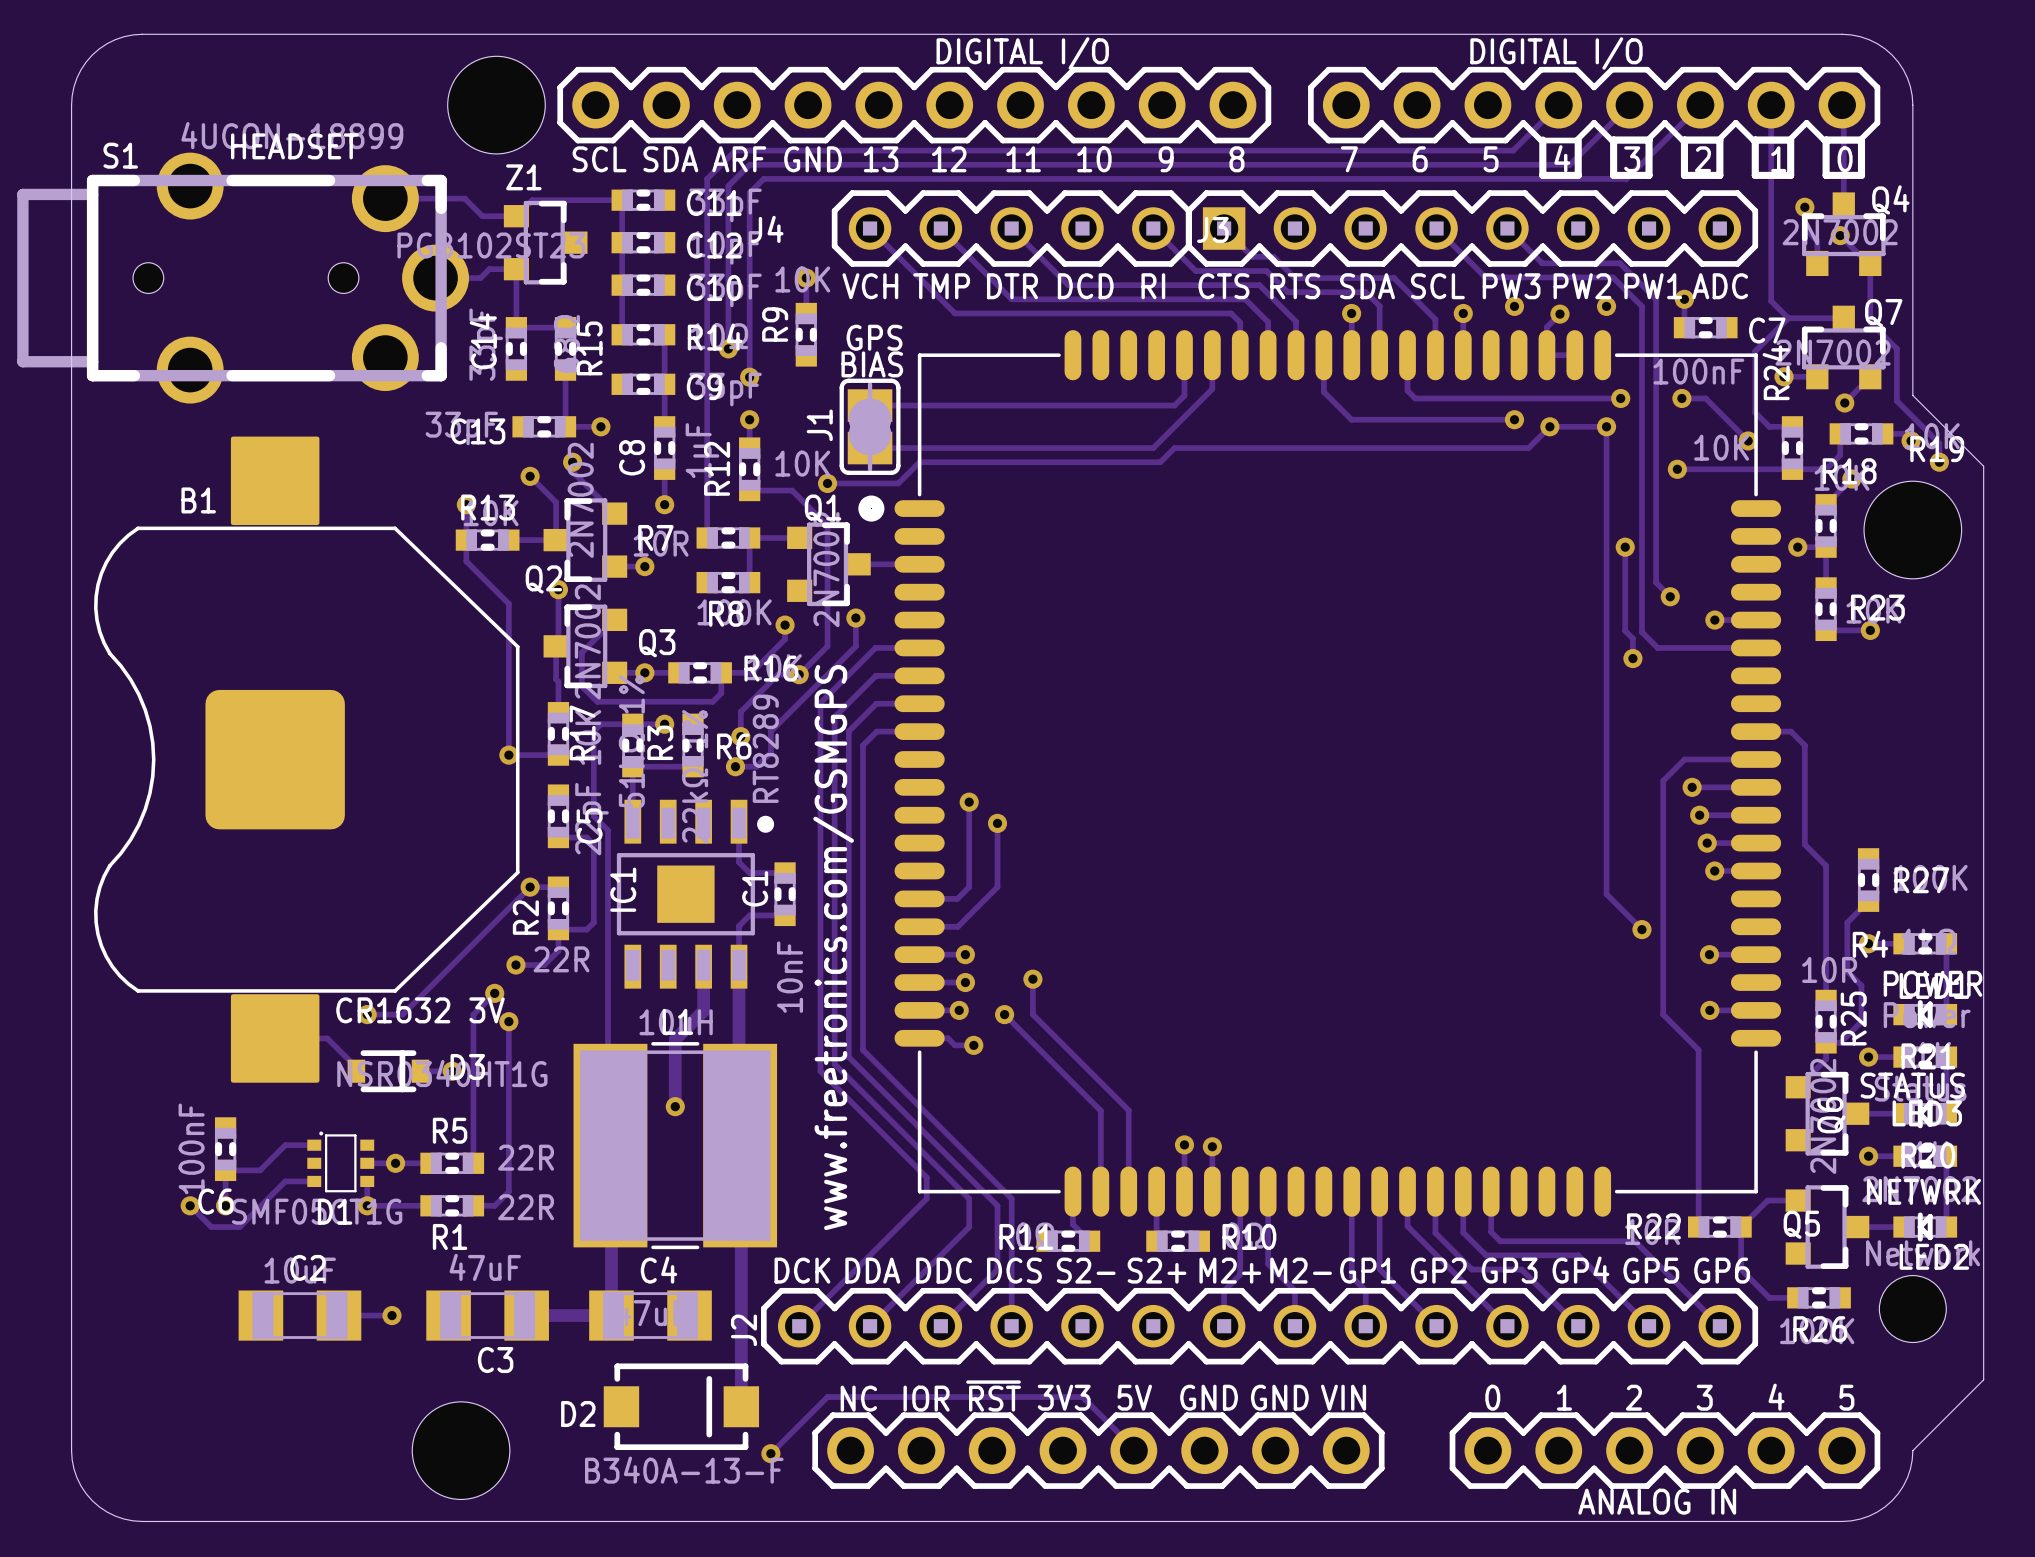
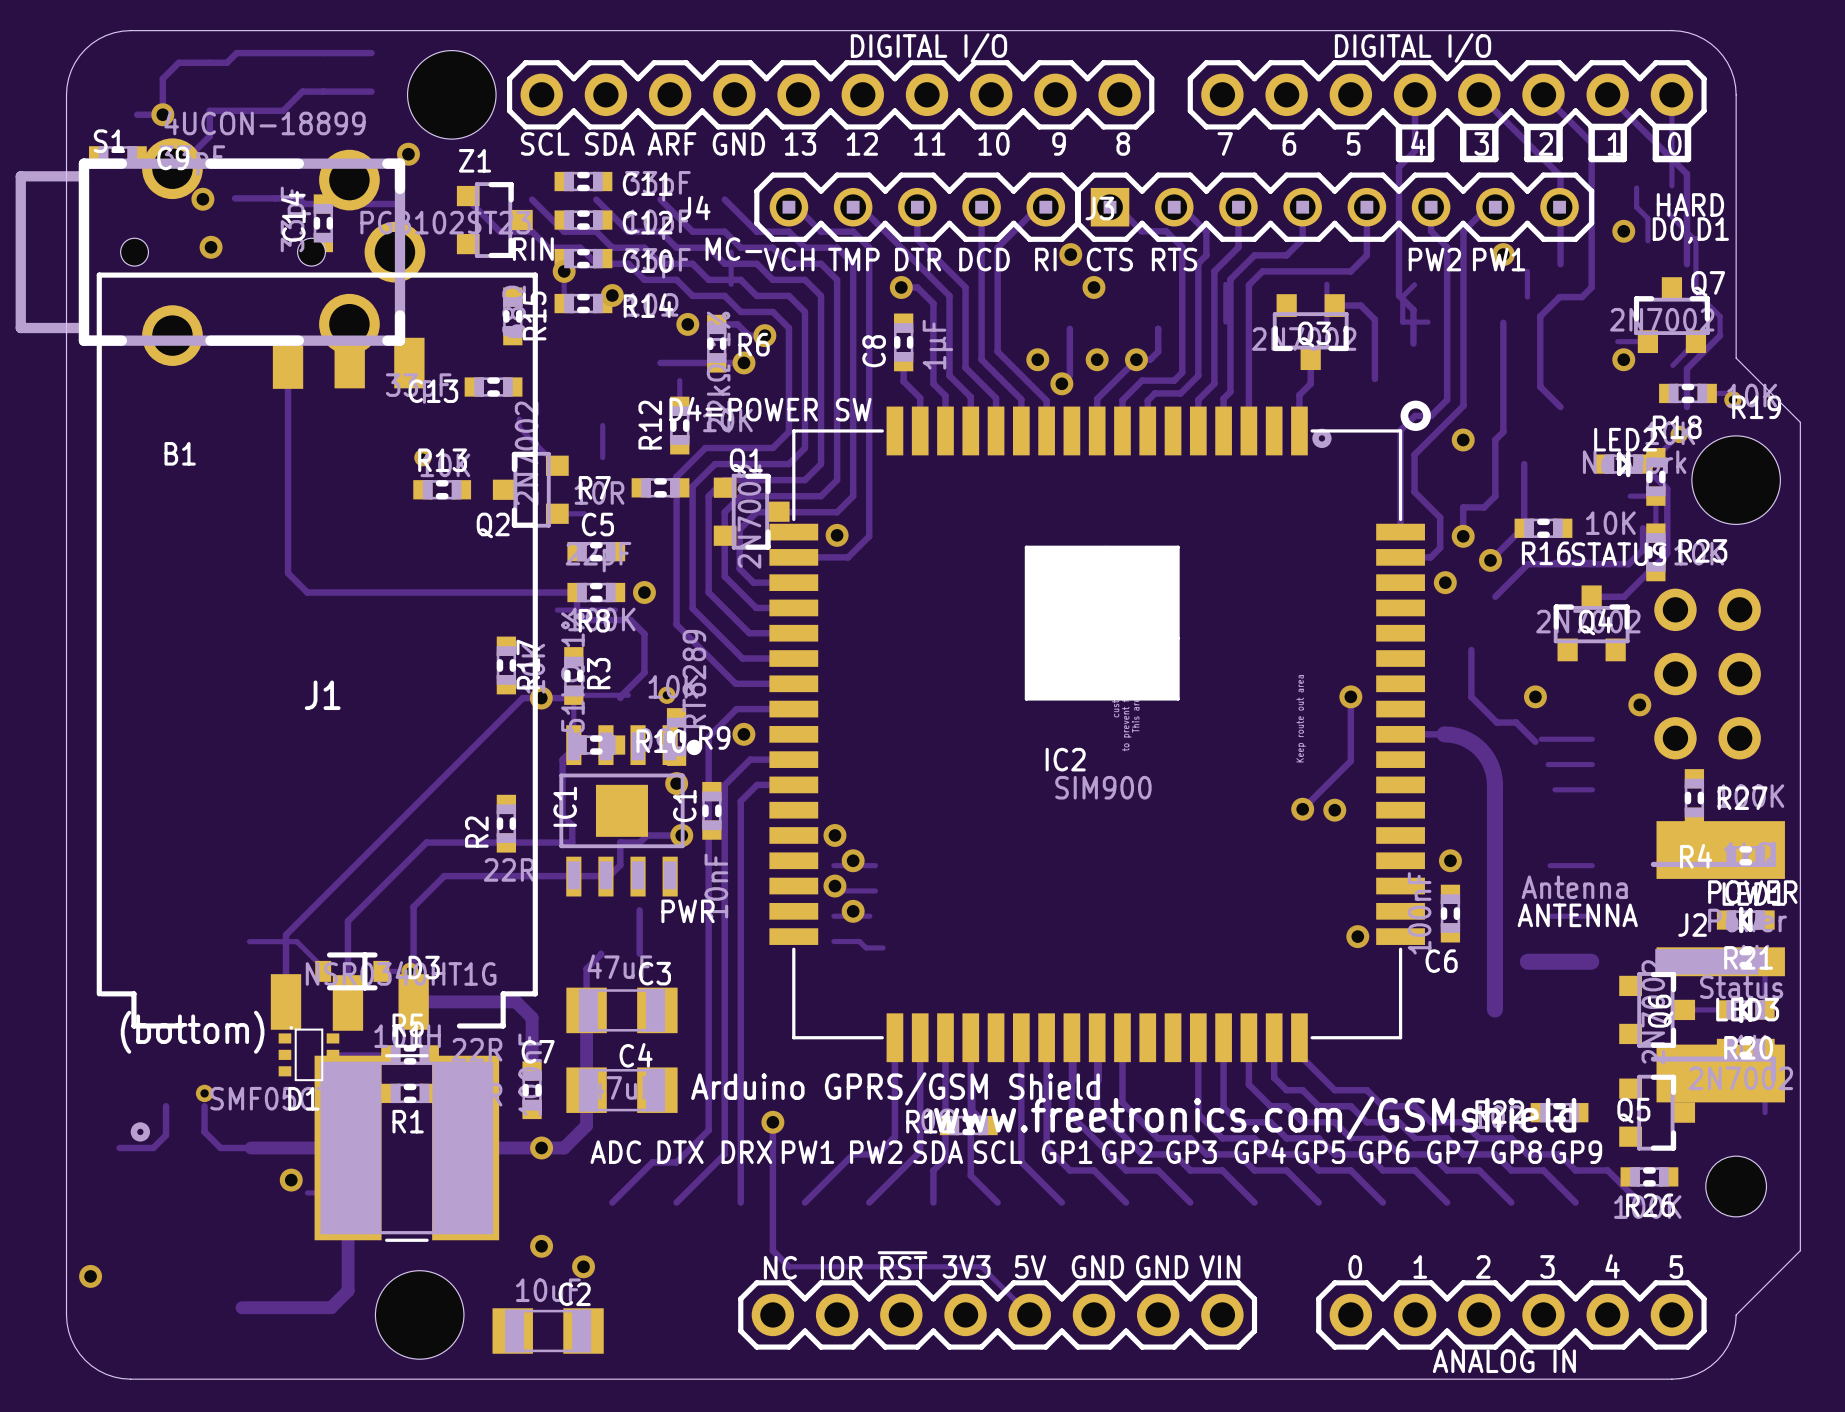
part footprint: [71, 34, 1984, 1522] -> [66, 30, 1801, 1380]
track: none -> (371, 53) (236, 53) (226, 62) (178, 62) (162, 78) (162, 114) (137, 114)
track: none -> (371, 91) (302, 91) (283, 110) (209, 110) (209, 136) (190, 155) (137, 155)
track: none -> (1415, 94) (1415, 151) (1399, 167) (1399, 295) (1413, 309) (1413, 343)
track: none -> (1479, 94) (1560, 176) (1560, 264)
track: none -> (1543, 94) (1591, 142) (1591, 287) (1582, 297) (1559, 297) (1540, 316) (1540, 386) (1560, 407)
track: none -> (1607, 94) (1686, 174) (1686, 264)
track: (1558, 105) (1513, 150) (735, 150) (707, 178) (707, 537) -> none
track: (1629, 105) (1569, 164) (749, 164) (728, 186) (728, 348) -> none
track: (1700, 105) (1626, 178) (763, 178) (749, 193) (749, 377) -> none
track: (1771, 105) (1771, 301) (1788, 318) -> none
via: none -> (162, 114)
text: HEADSET (294, 146) -> none
via: none -> (408, 154)
track: (385, 198) (464, 198) (482, 216) (516, 216) (532, 200) (622, 200) (622, 299) -> none
Q4 name position: Q4 (1890, 199) -> Q4 (1595, 622)
via: (1804, 207) -> none
track: none -> (235, 198) (298, 198) (304, 204) (400, 204)
via: none -> (202, 199)
track: none -> (467, 199) (499, 231) (532, 231) (548, 247) (580, 247) (596, 263) (628, 263) (644, 279) (676, 279) (692, 295) (724, 295) (740, 311) (772, 311) (788, 328) (788, 431) (772, 448) (705, 448) (676, 476) (676, 624) (735, 683) (793, 683)
track: none -> (532, 199) (564, 231) (596, 231) (612, 247) (644, 247) (660, 263) (692, 263) (708, 279) (740, 279) (756, 295) (788, 295) (805, 311) (805, 448) (788, 464) (715, 464) (692, 486) (692, 608) (742, 658) (793, 658)
track: none -> (596, 199) (628, 231) (660, 231) (676, 247) (708, 247) (724, 263) (756, 263) (772, 279) (805, 279) (821, 295) (821, 464) (805, 480) (724, 480) (708, 496) (708, 592) (749, 633) (793, 633)
track: none -> (660, 199) (692, 231) (724, 231) (740, 247) (772, 247) (788, 263) (821, 263) (837, 279) (837, 480) (821, 496) (740, 496) (724, 512) (724, 576) (756, 607) (793, 607)
track: none -> (724, 199) (756, 231) (788, 231) (805, 247) (837, 247) (853, 263) (853, 496) (837, 512) (756, 512) (739, 529) (739, 568) (753, 582) (793, 582)
track: none -> (788, 199) (821, 231) (853, 231) (869, 247) (869, 536) (848, 557) (793, 557)
track: none -> (853, 199) (949, 295) (949, 375) (970, 397) (970, 430)
track: none -> (917, 199) (917, 239) (965, 287) (965, 367) (996, 398) (996, 430)
track: none -> (981, 199) (981, 359) (1021, 399) (1021, 430)
track: none -> (1045, 199) (997, 247) (997, 351) (1046, 400) (1046, 430)
track: none -> (1110, 199) (1141, 231) (1166, 231) (1182, 247) (1182, 372) (1174, 380) (1142, 380) (1122, 400) (1122, 430)
track: none -> (1174, 199) (1206, 231) (1206, 255) (1198, 263) (1198, 375) (1180, 393) (1154, 393) (1147, 400) (1147, 430)
track: none -> (1238, 199) (1238, 247) (1214, 271) (1214, 383) (1198, 399) (1198, 430)
track: none -> (1302, 199) (1302, 239) (1286, 255) (1254, 255) (1230, 279) (1230, 391) (1223, 398) (1223, 430)
track: none -> (1366, 199) (1366, 255) (1350, 271) (1262, 271) (1248, 285) (1248, 430)
track: none -> (1431, 199) (1431, 231) (1447, 247) (1447, 399) (1431, 415) (1415, 415) (1400, 430) (1400, 532)
track: none -> (1495, 199) (1463, 231) (1463, 405) (1414, 454) (1414, 492) (1440, 517) (1440, 547) (1430, 557) (1400, 557)
text: none -> HARD (1690, 204)
track: (870, 228) (955, 313) (1231, 313) (1240, 322) (1240, 355) -> none
track: (940, 228) (1011, 299) (1245, 299) (1268, 322) (1268, 355) -> none
track: (1011, 228) (1068, 285) (1259, 285) (1296, 321) (1296, 355) -> none
track: (1153, 228) (1195, 271) (1266, 271) (1287, 292) (1365, 292) (1379, 306) (1379, 355) -> none
track: (1224, 228) (1252, 256) (1273, 256) (1294, 278) (1394, 278) (1435, 319) (1435, 355) -> none
track: (1436, 228) (1485, 277) (1613, 277) (1641, 306) (1641, 632) (1657, 647) (1756, 647) -> none
track: (1507, 228) (1542, 263) (1620, 263) (1656, 299) (1656, 582) (1670, 596) -> none
Q4 position: (1843, 234) -> (1591, 623)
via: (1840, 235) -> none
text: none -> D0,D1 (1690, 230)
via: none -> (1623, 231)
via: none -> (211, 247)
text: none -> RIN (533, 249)
text: none -> MC- (733, 249)
track: (435, 278) (480, 278) (489, 269) (516, 269) (516, 327) (565, 327) -> none
via: (806, 278) -> none
via: none -> (1070, 254)
via: none -> (1503, 254)
text: SDA (1367, 286) -> none
text: SCL (1437, 286) -> none
text: PW3 (1511, 286) -> none
text: ADC (1720, 286) -> none
via: none -> (564, 271)
via: (1684, 299) -> none
via: (1514, 306) -> none
via: (1606, 306) -> none
via: (1351, 313) -> none
via: (1463, 313) -> none
via: (1559, 314) -> none
track: none -> (901, 287) (917, 287) (933, 303) (933, 383) (945, 395) (945, 430)
via: none -> (901, 287)
via: none -> (1093, 287)
track: (1788, 318) (1843, 318) -> none
track: (1788, 318) (1755, 351) (1755, 412) (1769, 426) (1792, 426) -> none
R9 name rotation: 0° (775, 324) -> 90° clockwise (714, 737)
R9 name position: R9 (775, 324) -> R9 (714, 737)
via: none -> (612, 295)
C7 rotation: 0° (1705, 327) -> 90° clockwise (532, 1090)
C7 position: (1705, 327) -> (532, 1090)
C7 name position: C7 (1767, 330) -> C7 (538, 1051)
track: (664, 334) (664, 426) -> none
R9 position: (806, 334) -> (676, 737)
track: none -> (1334, 305) (1360, 305) (1374, 319) (1374, 378)
text: GPS (874, 337) -> none
C14 position: (516, 348) -> (323, 223)
via: (728, 348) -> none
track: (1184, 355) (1184, 395) (1174, 405) (870, 405) -> none
track: (1212, 355) (1212, 388) (1153, 448) (870, 448) -> none
track: (1323, 355) (1323, 392) (1351, 419) (1514, 419) -> none
track: (1407, 355) (1407, 390) (1415, 398) (1620, 398) -> none
track: none -> (1503, 322) (1503, 431) (1495, 440) (1495, 496) (1484, 507) (1463, 507) (1463, 536)
track: none -> (716, 324) (737, 324) (748, 335) (764, 335)
track: none -> (1069, 328) (1069, 375)
track: none -> (1158, 328) (1158, 351) (1150, 359) (1136, 359) (1097, 398) (1097, 430)
text: BIAS (872, 364) -> none
track: (565, 370) (565, 426) (600, 426) -> none
via: none -> (764, 335)
track: (1896, 370) (1896, 401) (1939, 443) (1939, 462) -> (1720, 335) (1686, 368) (1686, 407)
via position: (1784, 376) -> (1623, 359)
via position: (749, 377) -> (687, 324)
C9 position: (643, 384) -> (117, 155)
track: none -> (1310, 358) (1310, 383) (1299, 395) (1299, 430)
via: none -> (1037, 359)
via: none -> (1097, 359)
via: none -> (1136, 359)
track: none -> (903, 361) (903, 381) (920, 398) (920, 430)
via: (1620, 398) -> none
track: (1681, 398) (1705, 398) (1748, 440) -> none
via: (1681, 398) -> none
track: none -> (288, 363) (288, 573) (307, 592) (577, 592) (577, 611) (585, 620) (630, 620) (644, 634) (644, 672) (620, 698)
track: none -> (660, 362) (743, 362)
via: none -> (743, 362)
via: (1844, 402) -> none
via: (749, 419) -> none
via: (1514, 419) -> none
via: none -> (1061, 383)
via: (600, 426) -> none
J1: (870, 426) -> none
via: (1549, 426) -> none
via: (1606, 426) -> none
track: (1840, 433) (1840, 455) (1826, 469) (1677, 469) -> none
via: (1748, 440) -> none
C8 position: (664, 448) -> (903, 342)
R24: 10K (1792, 448) -> none
text: none -> D4=POWER SW (770, 409)
via: (572, 462) -> none
via: (1939, 462) -> none
via: (1677, 469) -> none
drawing: none -> [1312, 428, 1332, 449]
track: (530, 476) (556, 502) (556, 540) (508, 540) -> none
via: (530, 476) -> none
track: (827, 483) (898, 483) (919, 462) (1160, 462) (1174, 448) (1528, 448) (1549, 426) (1606, 426) (1606, 894) (1641, 929) -> none
via: (827, 483) -> none
via: none -> (1463, 440)
track: (749, 490) (792, 490) (827, 525) (827, 646) (799, 674) (777, 674) (740, 711) (740, 736) -> none
track: (466, 504) (466, 561) (508, 603) (508, 755) (558, 755) -> none
via: (664, 504) -> none
track: none -> (1524, 464) (1524, 528) (1490, 560)
track: none -> (1643, 464) (1667, 488) (1667, 553) (1624, 596) (1591, 596)
track: (799, 537) (749, 537) (749, 582) -> none
track: (1625, 547) (1625, 630) (1632, 638) (1632, 658) -> none
via: (1625, 547) -> none
via: (1797, 547) -> none
via: (644, 566) -> none
R8 position: (728, 582) -> (596, 592)
track: none -> (1643, 528) (1643, 549) (1628, 564) (1527, 564) (1495, 596)
track: (558, 589) (558, 644) (556, 646) (558, 712) -> none
via: (558, 589) -> none
via: none -> (837, 535)
via: none -> (1463, 536)
via: (1670, 596) -> none
track: (855, 618) (855, 646) (770, 731) (770, 752) (756, 766) (735, 766) -> none
via: (855, 618) -> none
via: none -> (1490, 560)
track: (614, 619) (581, 652) (581, 686) (597, 701) (712, 701) (721, 693) (721, 672) (751, 672) (785, 639) (785, 625) -> none
via: (1714, 620) -> none
via: (785, 625) -> none
track: (1826, 630) (1870, 630) -> none
via: (1870, 630) -> none
via: none -> (1445, 582)
Q3 name position: Q3 (657, 643) -> Q3 (1314, 334)
Q3 rotation: 0° (585, 646) -> 90° counterclockwise (1310, 332)
Q3 position: (585, 646) -> (1310, 332)
track: (919, 647) (875, 647) (820, 702) (820, 1071) (926, 1177) (926, 1198) (799, 1326) -> none
via: none -> (644, 592)
via: (1632, 658) -> none
R16 name position: R16 (771, 668) -> R16 (1546, 553)
via: (644, 672) -> none
R16 position: (700, 672) -> (1543, 528)
via: (799, 674) -> none
track: (919, 675) (875, 675) (834, 717) (834, 1064) (969, 1198) (969, 1227) (870, 1326) -> none
track: (919, 703) (876, 703) (848, 731) (848, 1057) (997, 1205) (997, 1269) (940, 1326) -> none
track: none -> (1471, 649) (1471, 696) (1496, 722) (1516, 722) (1535, 741)
part: none -> (317, 651)
track: (664, 724) (600, 724) (593, 731) (593, 816) (608, 830) (608, 1078) (600, 1085) (600, 1136) (611, 1146) (611, 1315) (526, 1315) -> none
via: (664, 724) -> none
track: (919, 731) (876, 731) (862, 745) (862, 1050) (1011, 1198) (1011, 1326) -> none
track: (1756, 731) (1790, 731) (1804, 745) (1804, 844) (1826, 865) (1826, 1000) -> none
via: (740, 736) -> none
R6 position: (693, 745) -> (716, 343)
via: (508, 755) -> none
part: (306, 759) -> none
track: (1756, 759) (1684, 759) (1663, 780) (1663, 1014) (1698, 1050) (1698, 1227) -> none
text: none -> J1 (322, 695)
track: none -> (1350, 696) (1350, 761) (1302, 809)
via: none -> (1350, 696)
via: none -> (541, 698)
track: none -> (572, 698) (522, 698) (286, 934) (286, 1001)
part: (1319, 773) -> none
via: none -> (1639, 704)
track: none -> (793, 709) (736, 709) (708, 737) (708, 1130) (676, 1162) (652, 1162) (612, 1202)
track: (1692, 787) (1756, 787) -> none
via position: (1692, 787) -> (1535, 696)
track: (969, 802) (969, 887) (957, 898) (919, 898) -> none
via: (969, 802) -> none
IC2: none -> SIM900 (1100, 731)
via: none -> (743, 734)
track: none -> (1400, 734) (1444, 734) (1463, 738) (1480, 749) (1491, 765) (1494, 784) (1494, 1009)
via: (1699, 815) -> none
C5 rotation: 0° (558, 816) -> 90° clockwise (596, 551)
C5 position: (558, 816) -> (596, 551)
track: none -> (577, 745) (562, 759) (562, 815) (572, 825) (572, 842) (426, 842) (347, 921) (347, 1002)
track: (739, 821) (739, 862) (749, 872) (785, 872) -> none
track: (997, 823) (997, 887) (957, 926) (919, 926) -> none
via: (997, 823) -> none
track: (558, 837) (586, 837) (593, 844) (593, 922) (586, 929) (558, 929) (558, 950) (544, 965) (515, 965) -> none
track: none -> (793, 759) (750, 759) (724, 785) (724, 1154) (676, 1202)
via: (1707, 843) -> none
via: none -> (676, 783)
track: none -> (793, 784) (757, 784) (740, 801) (740, 1202)
via: (1714, 871) -> none
via: (530, 887) -> none
track: (558, 887) (530, 887) (402, 1014) (367, 1014) -> none
via: none -> (1302, 809)
via: none -> (1334, 810)
track: (1868, 901) (1847, 922) (1847, 971) (1861, 985) (1861, 1021) (1840, 1042) (1826, 1042) (1826, 1059) (1798, 1087) -> none
track: (785, 915) (749, 915) (739, 926) (739, 1124) (742, 1127) (742, 1143) (740, 1145) (741, 1406) -> none
track: none -> (681, 835) (646, 835) (639, 842) (620, 842) (620, 865) (609, 876) (444, 876) (413, 906) (413, 1001) (516, 1001) (532, 1017) (532, 1070)
via: none -> (681, 835)
via: none -> (834, 835)
via: (1641, 929) -> none
via: (1868, 943) -> none
track: (1946, 943) (1946, 1014) -> none
text: www.freetronics.com/GSMGPS (833, 947) -> none
via: none -> (853, 860)
via: none -> (1450, 860)
via: (965, 954) -> none
via: (1709, 954) -> none
via: (515, 965) -> none
track: (703, 966) (703, 1011) (675, 1039) (675, 1106) -> none
via: none -> (834, 886)
J2 value: none -> Antenna (1574, 887)
track: (1032, 979) (1032, 1014) (1128, 1110) (1128, 1191) -> none
via: (1032, 979) -> none
via: (965, 982) -> none
track: (494, 993) (473, 1014) (473, 1163) -> none
via: (494, 993) -> none
track: none -> (639, 910) (639, 953)
text: none -> PWR (688, 911)
text: none -> ANTENNA (1577, 915)
text: CR1632 3V (420, 1010) -> none
via position: (959, 1010) -> (853, 911)
via: (1709, 1010) -> none
via: (367, 1014) -> none
track: (1004, 1014) (1100, 1110) (1100, 1191) -> none
via: (1004, 1014) -> none
track: (508, 1021) (508, 1191) (494, 1205) (473, 1205) -> none
via: (508, 1021) -> none
R25: 10R (1826, 1021) -> none
via: none -> (1357, 936)
via: (973, 1045) -> none
track: none -> (601, 953) (586, 968) (586, 1125) (564, 1147) (465, 1147)
via: (1868, 1057) -> none
track: none -> (1527, 961) (1591, 961)
text position: STATUS (1912, 1085) -> STATUS (1618, 554)
via: (675, 1106) -> none
text: none -> (bottom) (192, 1032)
track: none -> (894, 1037) (894, 1136) (877, 1154) (853, 1154) (805, 1202)
track: none -> (920, 1037) (920, 1151) (869, 1202)
track: none -> (945, 1037) (945, 1158) (933, 1170) (933, 1202)
track: none -> (970, 1037) (970, 1175) (997, 1202)
track: none -> (1021, 1037) (1021, 1162) (1061, 1202)
track: none -> (1046, 1037) (1046, 1147) (1069, 1170) (1093, 1170) (1126, 1202)
track: none -> (1071, 1037) (1071, 1116) (1126, 1170) (1158, 1170) (1190, 1202)
via: (1184, 1144) -> none
track: none -> (1097, 1037) (1097, 1109) (1142, 1154) (1174, 1154) (1190, 1170) (1222, 1170) (1254, 1202)
track: none -> (1122, 1037) (1122, 1102) (1158, 1138) (1190, 1138) (1206, 1154) (1238, 1154) (1254, 1170) (1286, 1170) (1318, 1202)
track: none -> (1198, 1037) (1198, 1114) (1222, 1138) (1254, 1138) (1270, 1154) (1302, 1154) (1318, 1170) (1350, 1170) (1382, 1202)
track: none -> (1223, 1037) (1223, 1107) (1238, 1122) (1270, 1122) (1286, 1138) (1318, 1138) (1334, 1154) (1366, 1154) (1382, 1170) (1415, 1170) (1447, 1202)
track: none -> (1274, 1037) (1274, 1077) (1286, 1090) (1302, 1090) (1318, 1106) (1350, 1106) (1366, 1122) (1399, 1122) (1415, 1138)
track: none -> (1299, 1037) (1299, 1054) (1334, 1090) (1366, 1090) (1382, 1106) (1415, 1106) (1431, 1122) (1463, 1122) (1479, 1138) (1511, 1138) (1527, 1154) (1559, 1154) (1575, 1170) (1607, 1170) (1639, 1202)
track: (314, 1145) (285, 1145) (260, 1170) (225, 1170) (225, 1205) -> none
L1 position: (675, 1145) -> (406, 1147)
via: (1212, 1146) -> none
C6 position: (225, 1149) -> (1450, 913)
via: (1868, 1156) -> none
via: (395, 1163) -> none
track: (314, 1181) (285, 1181) (239, 1227) (211, 1227) (190, 1205) -> none
track: (367, 1181) (367, 1205) (430, 1205) -> none
track: (1240, 1191) (1240, 1274) (1224, 1290) (1224, 1326) -> none
track: (1268, 1191) (1268, 1263) (1294, 1290) (1294, 1326) -> none
track: (1351, 1191) (1351, 1276) (1365, 1290) (1365, 1326) -> none
track: (1379, 1191) (1379, 1269) (1436, 1326) -> none
track: (1407, 1191) (1407, 1226) (1507, 1326) -> none
track: (1435, 1191) (1435, 1232) (1472, 1269) (1521, 1269) (1578, 1326) -> none
track: (1463, 1191) (1463, 1232) (1486, 1255) (1489, 1255) -> (1248, 1037) (1248, 1084) (1270, 1106) (1286, 1106) (1302, 1122) (1334, 1122) (1350, 1138)
track: (1491, 1191) (1491, 1232) (1500, 1241) (1634, 1241) (1719, 1326) -> none
text: NETWRK (1923, 1191) -> none
text: none -> Arduino GPRS/GSM Shield (895, 1088)
track: (1798, 1200) (1767, 1200) (1741, 1227) (1741, 1269) (1769, 1297) (1797, 1297) -> none
via: (190, 1205) -> none
via: (367, 1205) -> none
track: none -> (166, 1106) (166, 1135) (153, 1147) (119, 1147)
track: none -> (204, 1106) (204, 1131) (220, 1147) (348, 1147) (348, 1290) (331, 1307) (241, 1307)
track: (1856, 1227) (1903, 1227) -> none
LED2 rotation: 0° (1925, 1227) -> 180° (1623, 464)
LED2 position: (1925, 1227) -> (1623, 464)
text: none -> www.freetronics.com/GSMshield (1255, 1118)
drawing: none -> [130, 1122, 150, 1142]
via: none -> (772, 1122)
R10 position: (1178, 1241) -> (596, 745)
track: (1525, 1255) (1560, 1255) -> (1382, 1138) (1399, 1154) (1431, 1154) (1447, 1170) (1479, 1170) (1511, 1202)
track: (1578, 1255) (1649, 1326) -> (1431, 1138) (1447, 1138) (1463, 1154) (1495, 1154) (1511, 1170) (1543, 1170) (1575, 1202)
via: none -> (541, 1147)
C2 name position: C2 (307, 1267) -> C2 (574, 1294)
C4 name position: C4 (658, 1270) -> C4 (636, 1055)
text: none -> ADC (615, 1152)
text: none -> DTX (680, 1152)
text: DCK (802, 1270) -> DRX (746, 1152)
text: DDA (872, 1270) -> PW1 (807, 1152)
text: DDC (944, 1270) -> PW2 (876, 1152)
text: DCS (1014, 1270) -> SDA (938, 1152)
text: S2- (1086, 1270) -> SCL (998, 1152)
text: S2+ (1157, 1270) -> none
text: M2+ (1230, 1270) -> none
text: M2- (1301, 1270) -> none
text position: GP1 (1368, 1270) -> GP1 (1067, 1152)
text position: GP2 (1438, 1270) -> GP2 (1127, 1152)
text position: GP3 (1509, 1270) -> GP3 (1191, 1152)
text position: GP4 (1580, 1270) -> GP4 (1260, 1151)
text: none -> GP7 (1452, 1152)
text position: GP5 (1651, 1270) -> GP5 (1319, 1152)
text: none -> GP8 (1516, 1152)
text position: GP6 (1722, 1270) -> GP6 (1384, 1152)
text: none -> GP9 (1576, 1152)
J2 footprint: [760, 1287, 1759, 1365] -> [1650, 821, 1785, 1103]
via: none -> (291, 1180)
C2 position: (299, 1315) -> (548, 1331)
via: (392, 1315) -> none
C3 position: (487, 1315) -> (621, 1010)
C4 position: (650, 1315) -> (621, 1090)
J2 name position: J2 (743, 1330) -> J2 (1692, 924)
C3 name position: C3 (495, 1360) -> C3 (654, 973)
via: none -> (541, 1246)
via: none -> (583, 1266)
track: (870, 1397) (827, 1397) (770, 1453) -> (788, 1266) (772, 1250) (772, 1122)
D2: B340A-13-F (681, 1406) -> none
via: none -> (90, 1276)
via: (770, 1453) -> none

